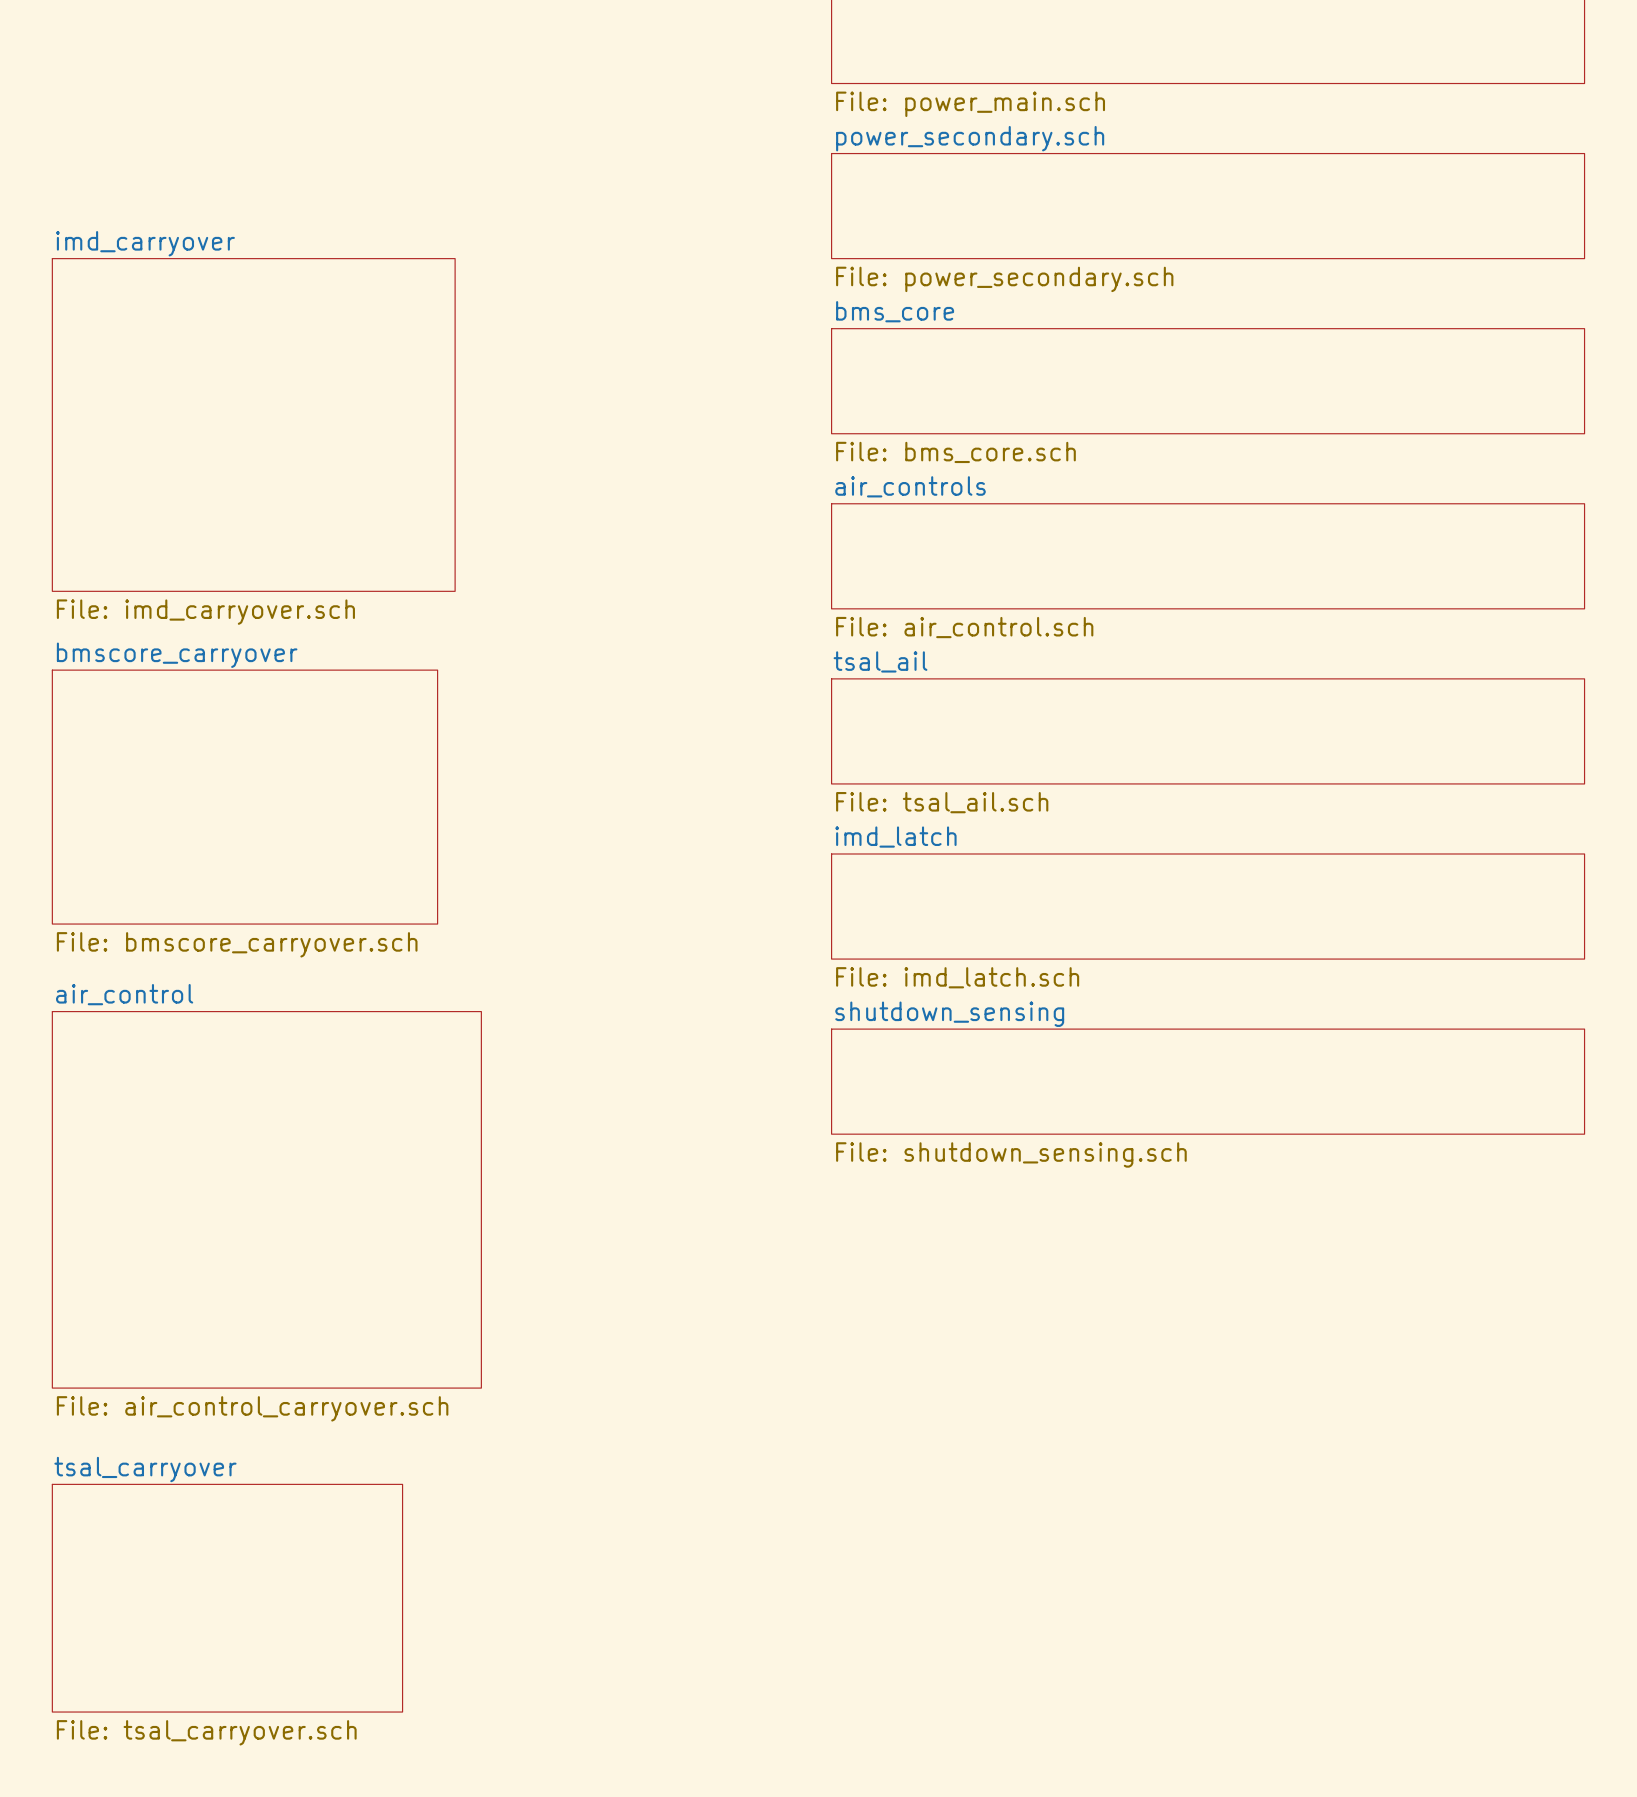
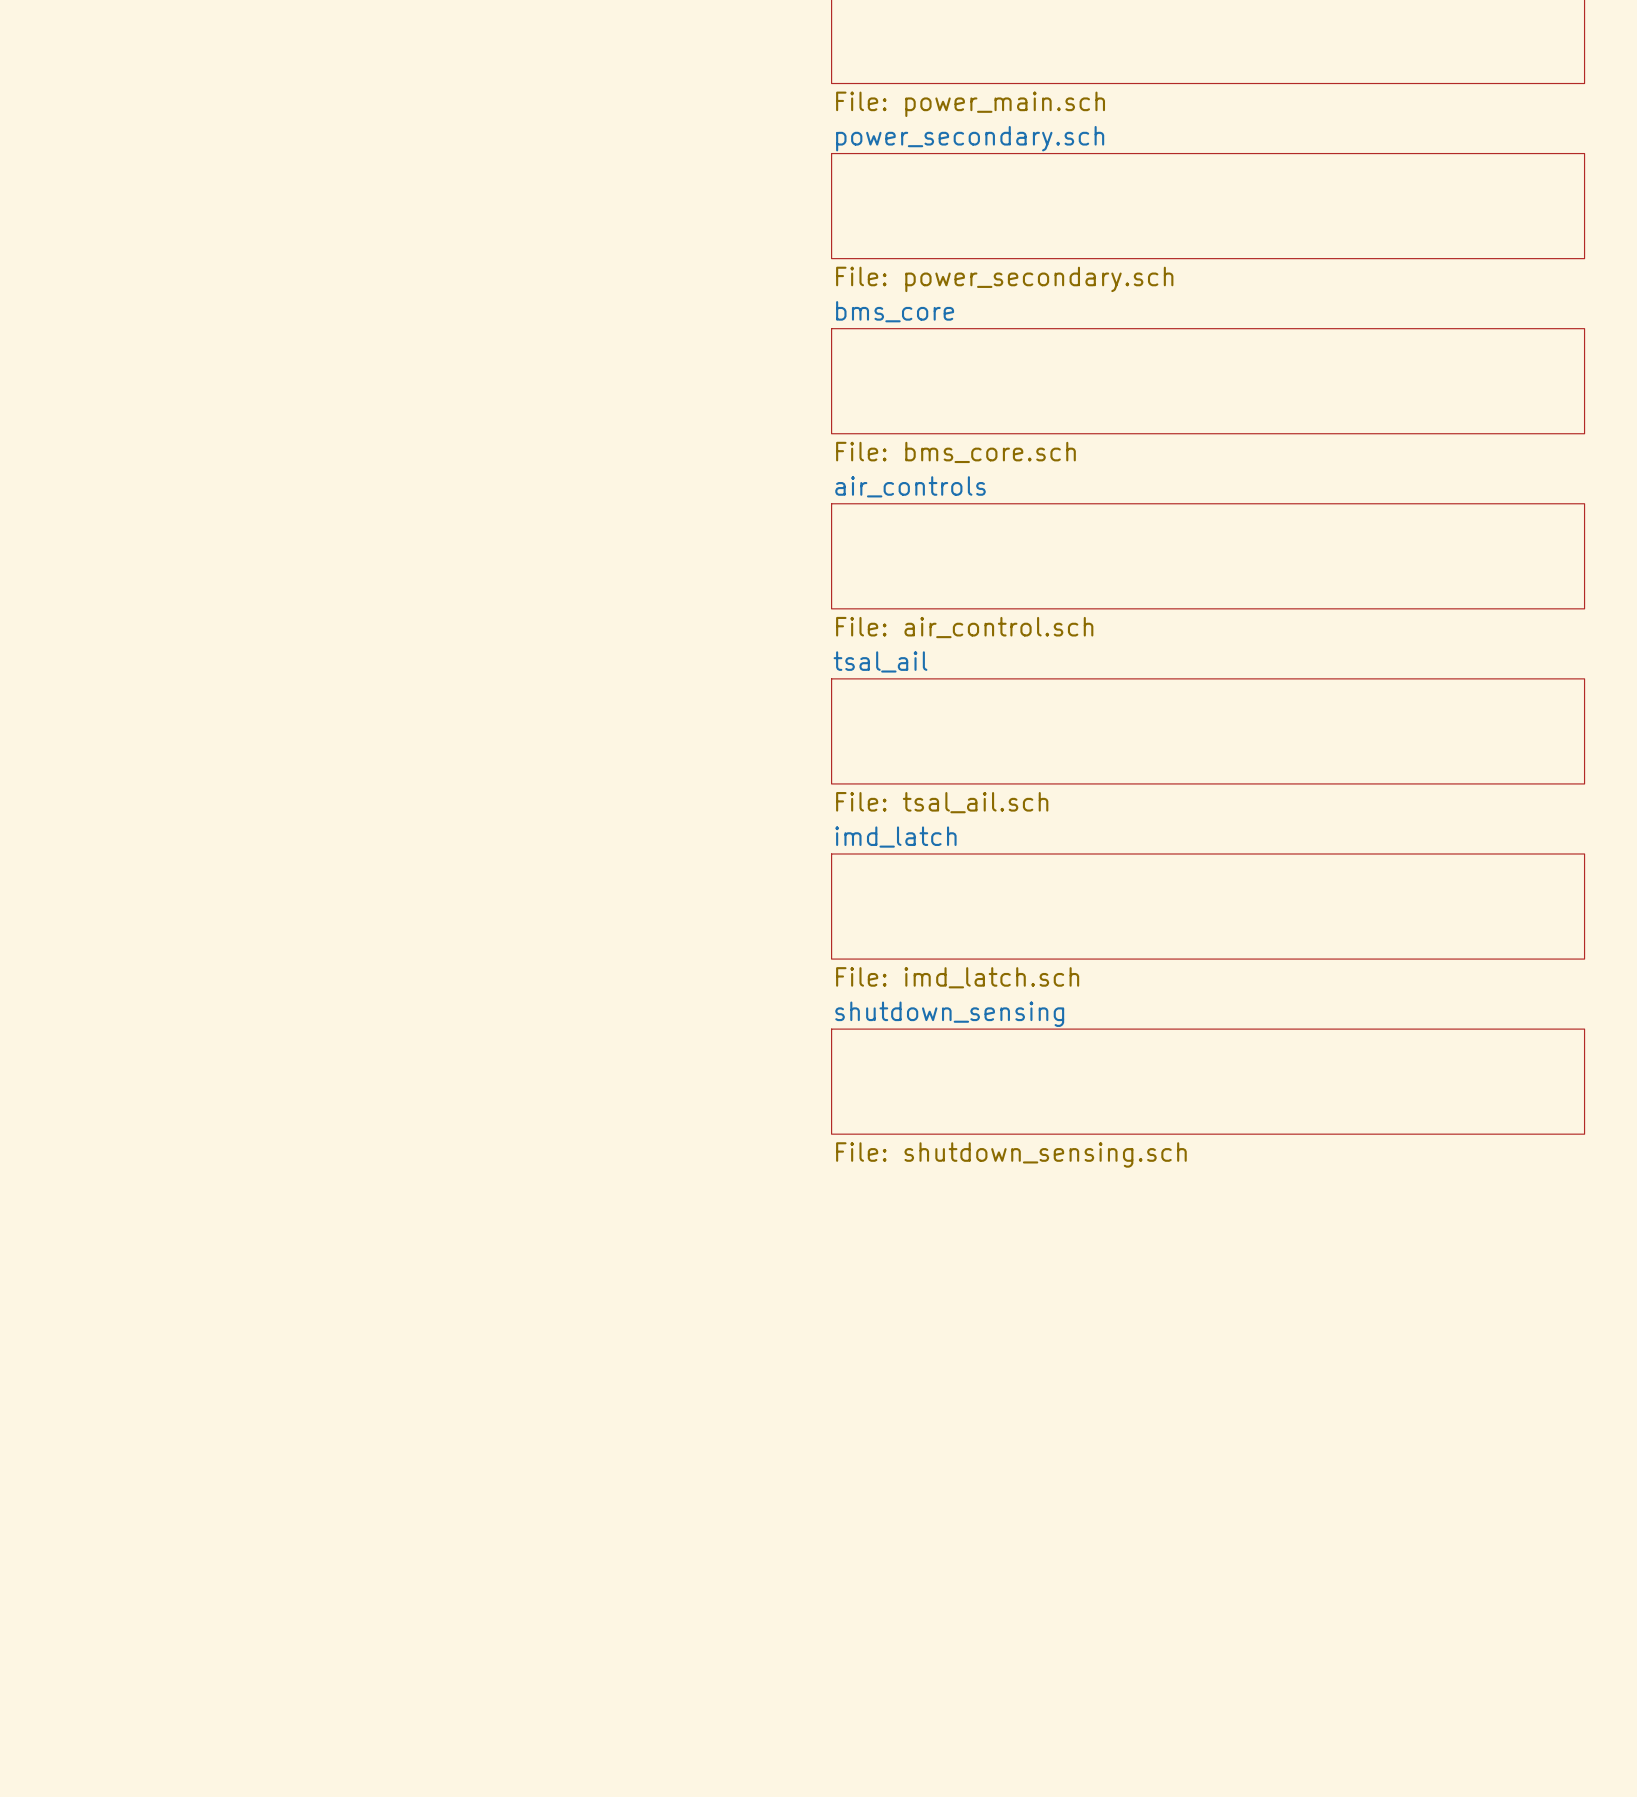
sheet imd_carryover: File: imd_carryover.sch (253, 424) -> none
sheet bmscore_carryover: File: bmscore_carryover.sch (244, 797) -> none
sheet air_control: File: air_control_carryover.sch (266, 1199) -> none
sheet tsal_carryover: File: tsal_carryover.sch (227, 1598) -> none

